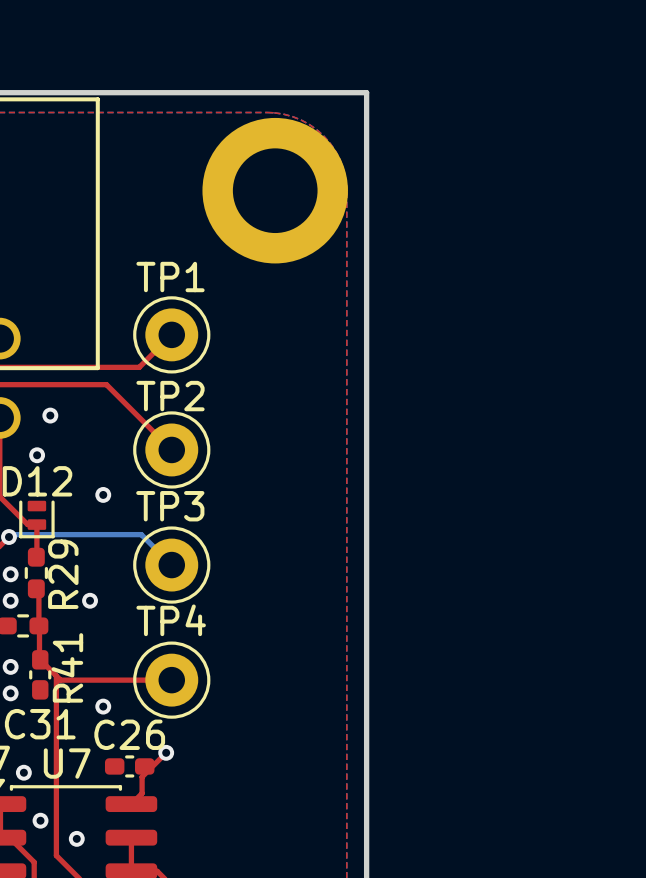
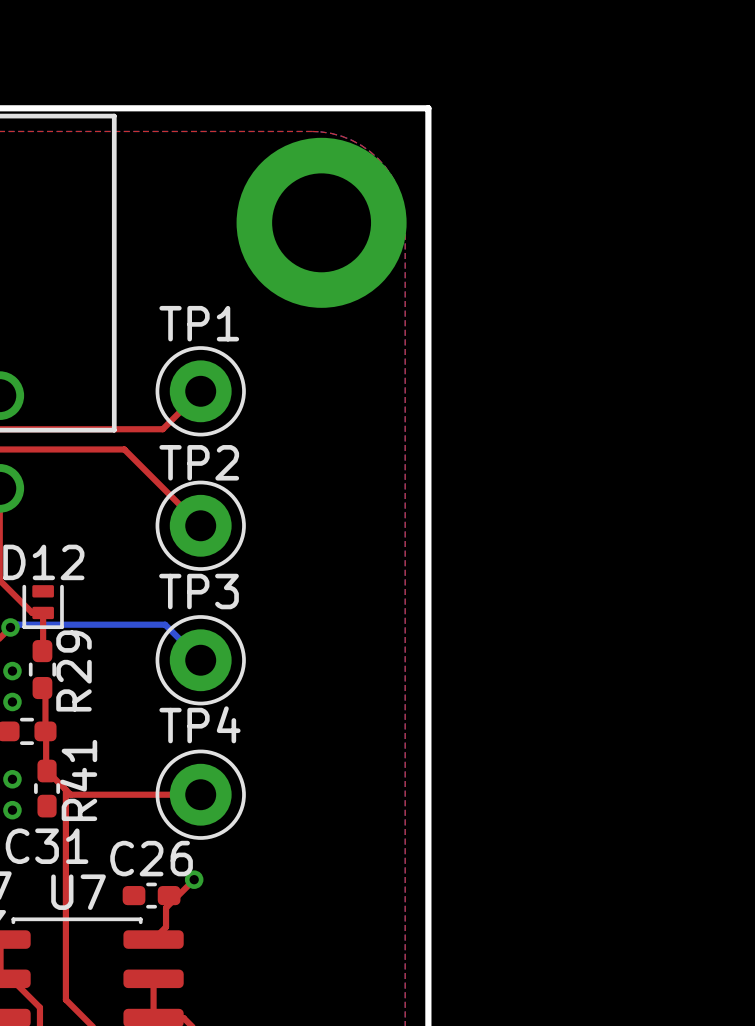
via: (50, 415) -> none
via: (37, 455) -> none
via: (103, 494) -> none
via: (90, 600) -> none
via: (103, 706) -> none
via: (23, 772) -> none
via: (40, 820) -> none
via: (76, 838) -> none

